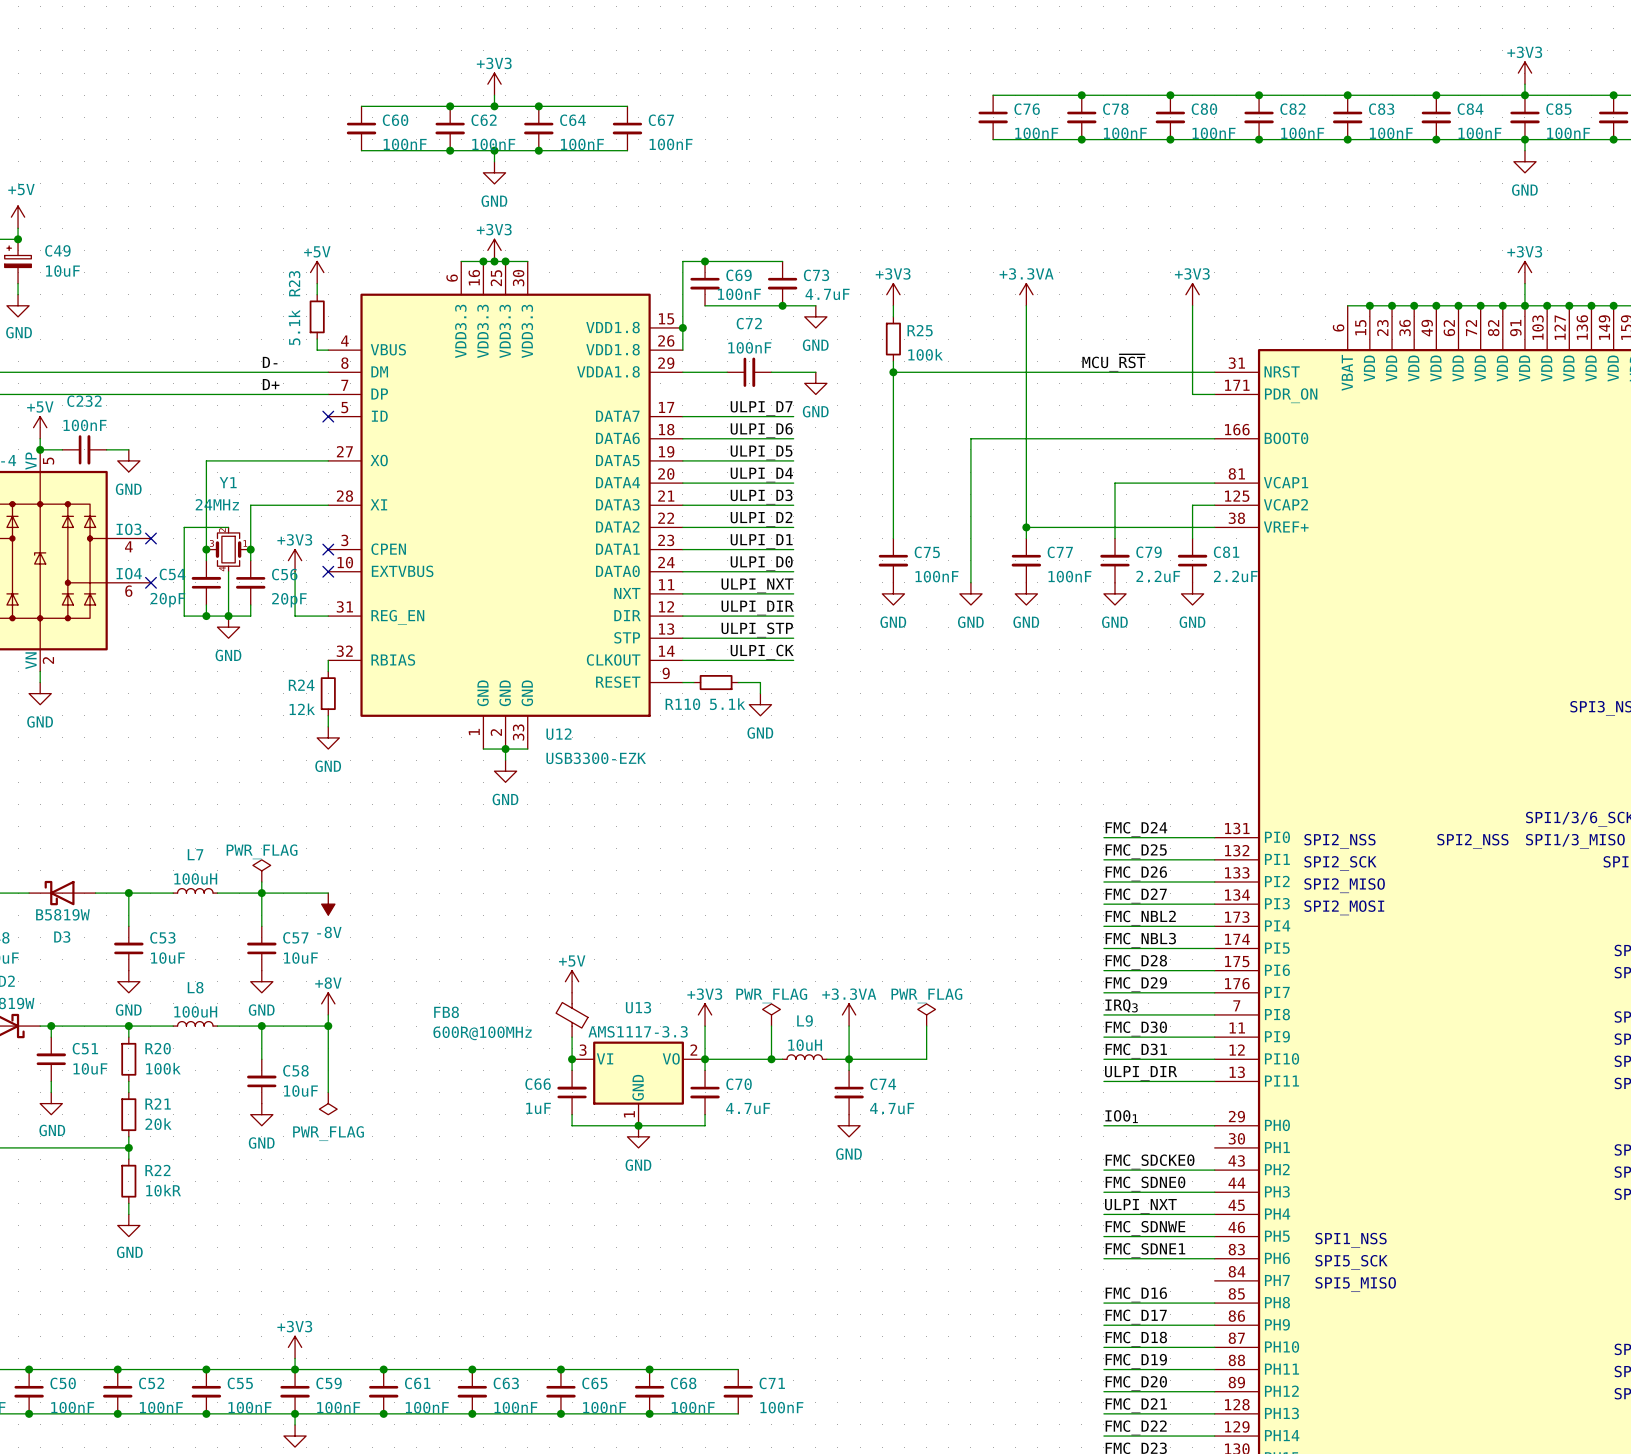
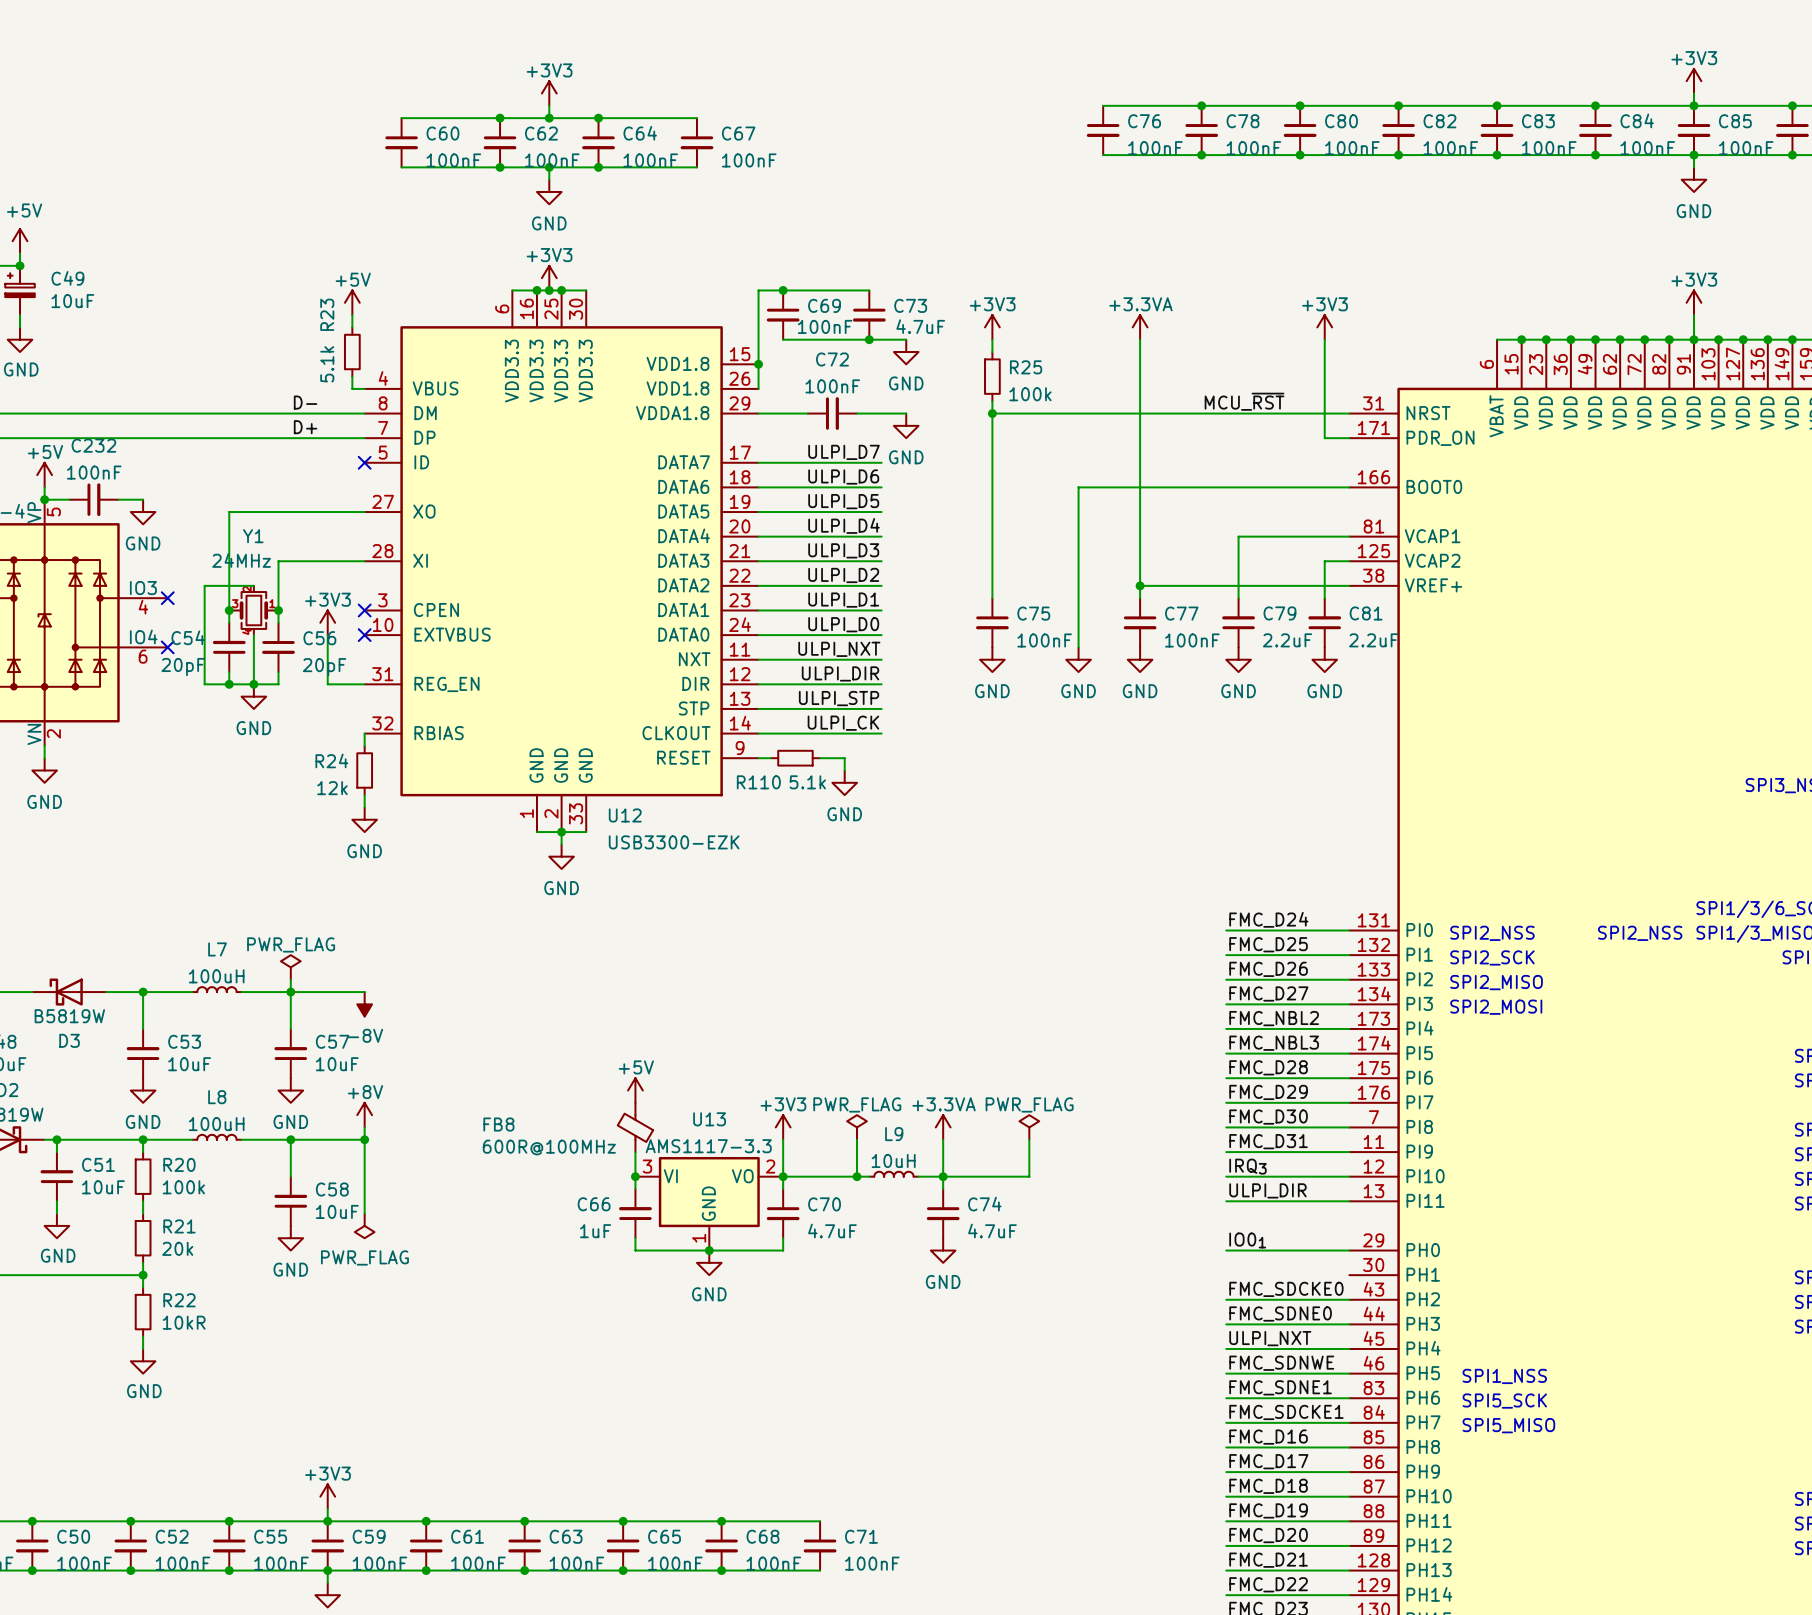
label: IRQ3 (1121, 1005) -> FMC_D30 (1268, 1117)
label: FMC_D30 (1136, 1028) -> FMC_D31 (1268, 1141)
label: FMC_D31 (1136, 1051) -> IRQ3 (1247, 1166)
label: none -> FMC_SDCKE1 (1286, 1412)
wire: none -> (1226, 1422) (1349, 1422)

